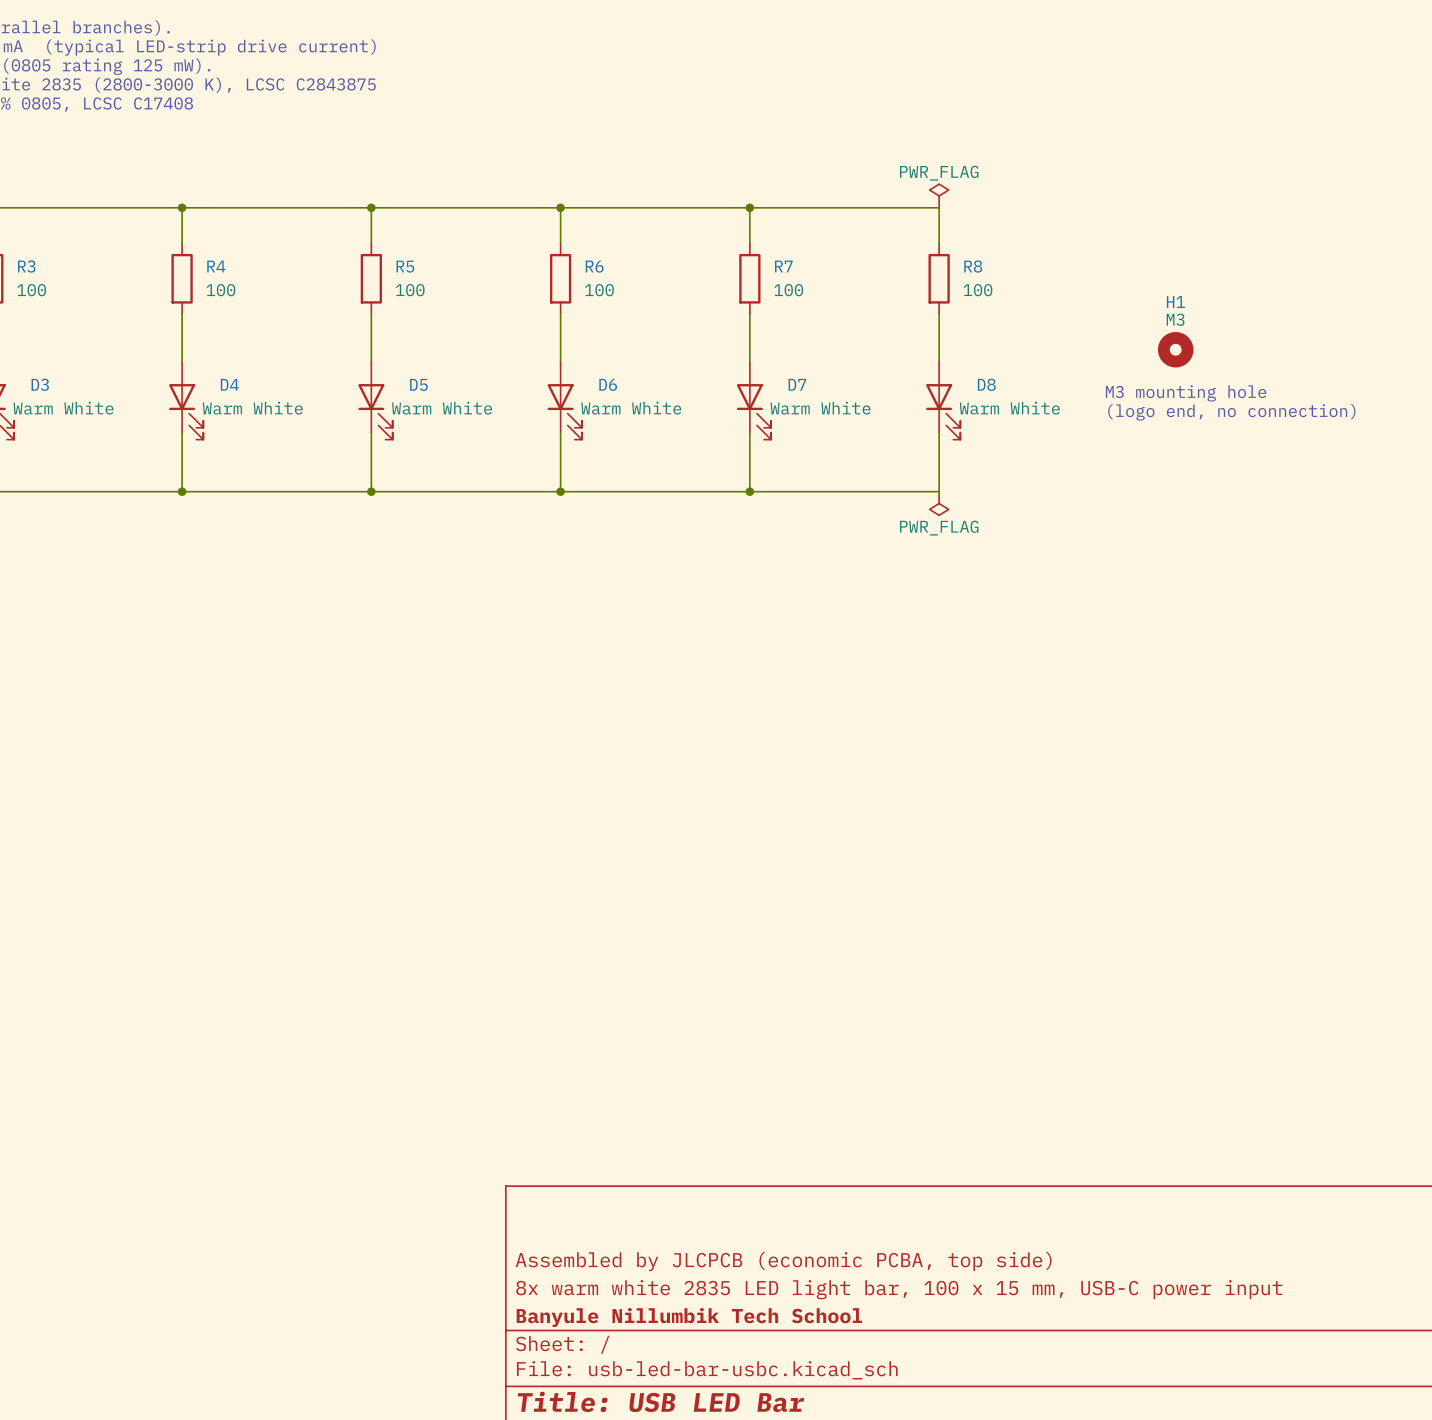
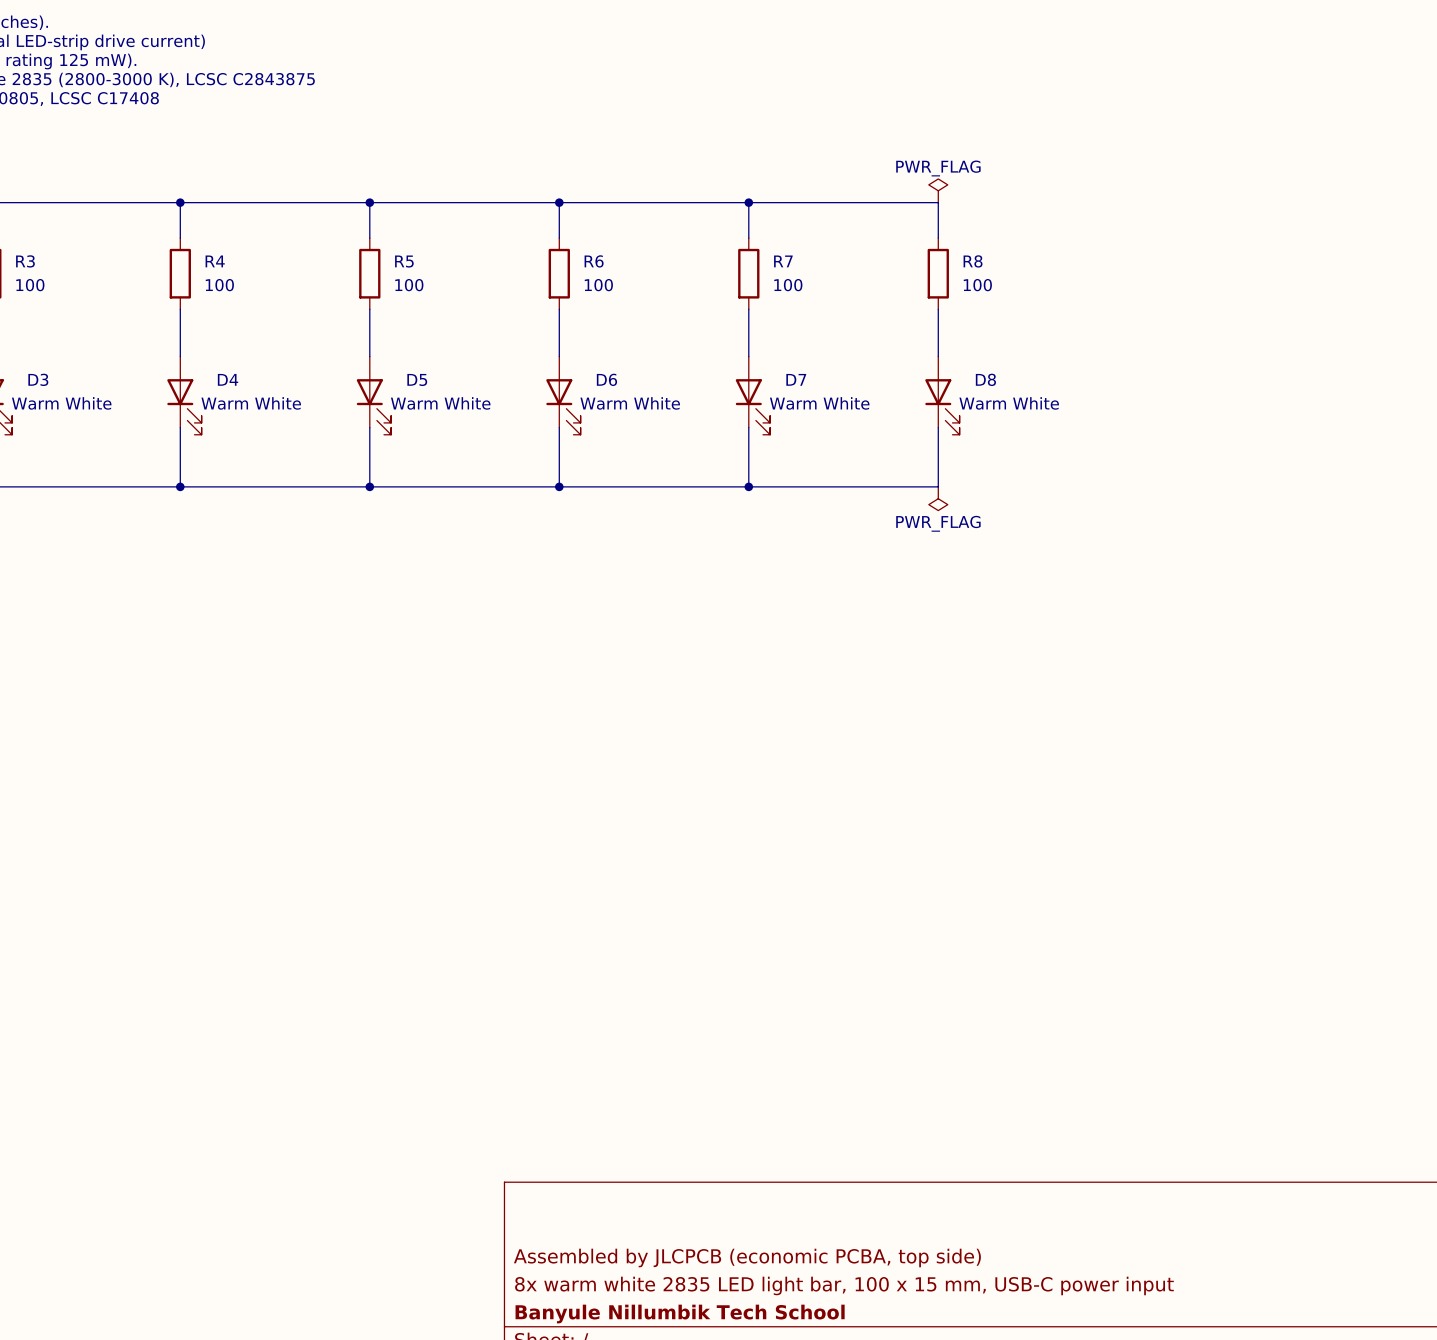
H1: M3 (1175, 349) -> none
text: M3 mounting hole (1186, 393) -> none
text: (logo end, no connection) (1231, 412) -> none

